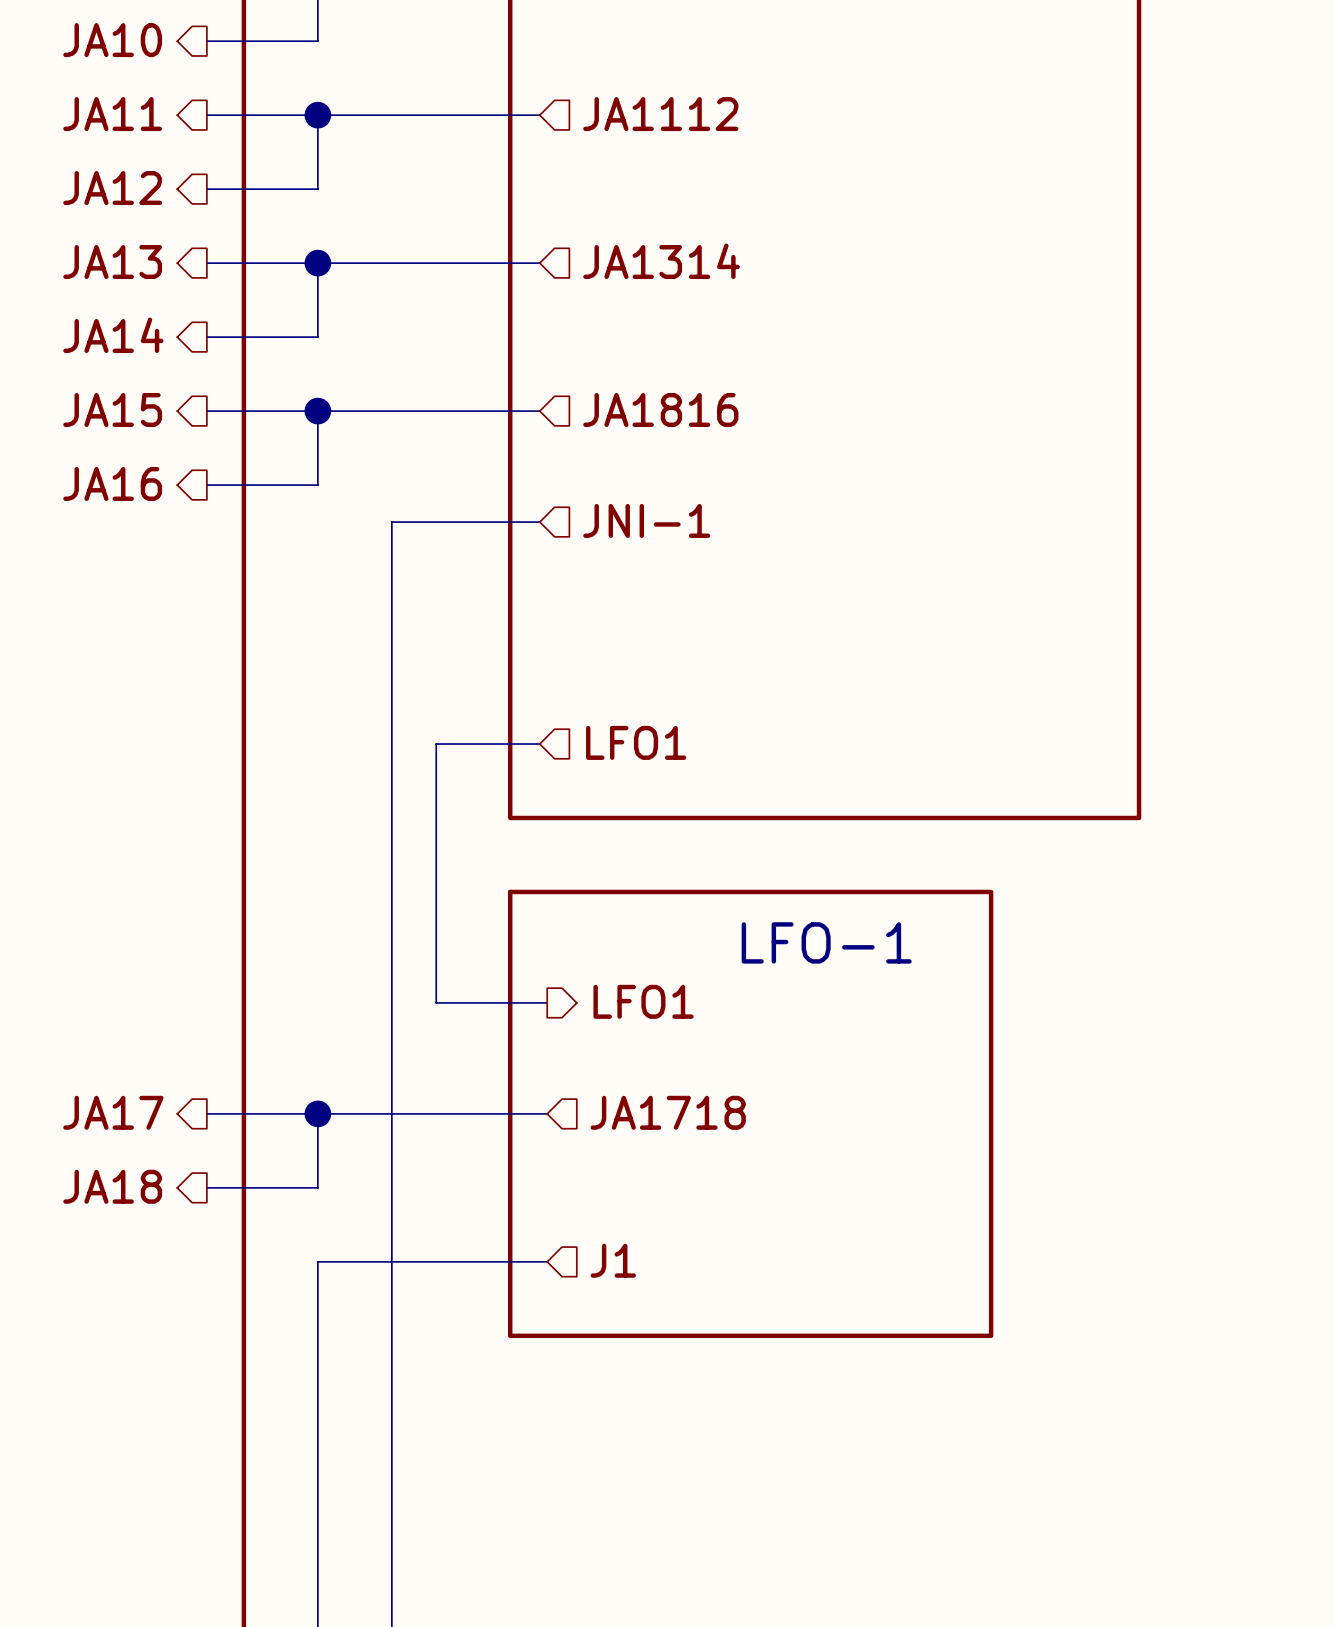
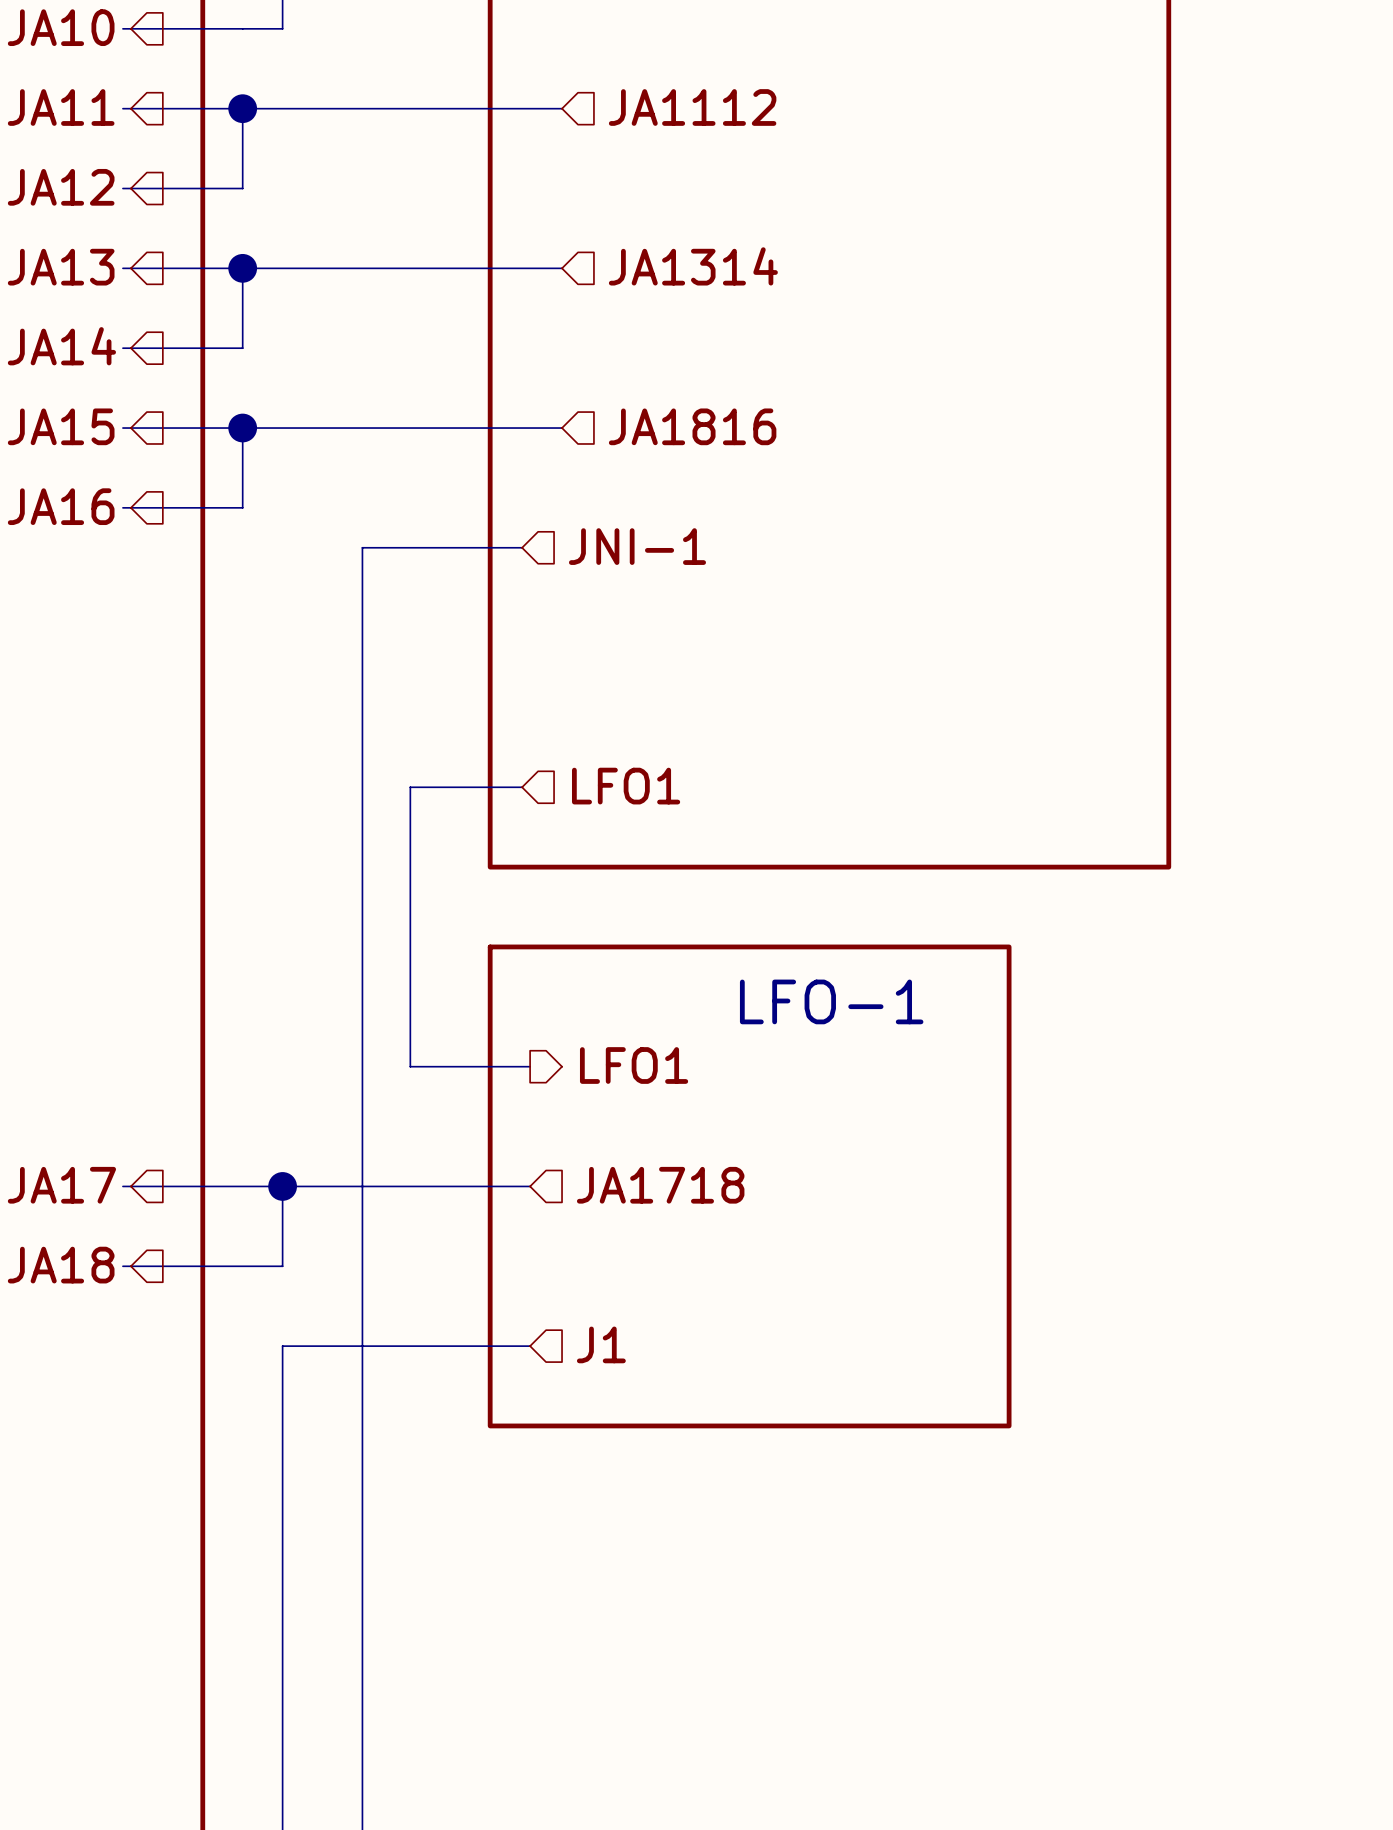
bus: none -> (122, 28) (162, 28)
hierarchical label position: JA1112 (660, 114) -> JA1112 (692, 107)
bus: none -> (122, 108) (162, 108)
bus: (317, 115) (317, 189) (280, 189) -> (242, 108) (242, 188)
junction position: (317, 115) -> (242, 108)
bus: none -> (522, 108) (562, 108)
bus: none -> (122, 188) (162, 188)
hierarchical label position: JA1314 (661, 261) -> JA1314 (693, 266)
bus: none -> (122, 268) (162, 268)
bus: (317, 263) (317, 337) (280, 337) -> (242, 268) (242, 348)
junction position: (317, 263) -> (242, 268)
bus: none -> (522, 268) (562, 268)
bus: none -> (122, 348) (162, 348)
hierarchical label position: JA1816 (660, 409) -> JA1816 (692, 426)
bus: none -> (122, 428) (162, 428)
bus: (317, 411) (317, 485) (280, 485) -> (242, 428) (242, 507)
junction position: (317, 411) -> (242, 428)
bus: none -> (522, 428) (562, 428)
bus: none -> (122, 507) (162, 507)
bus: none -> (122, 1186) (162, 1186)
bus: none -> (122, 1266) (162, 1266)

